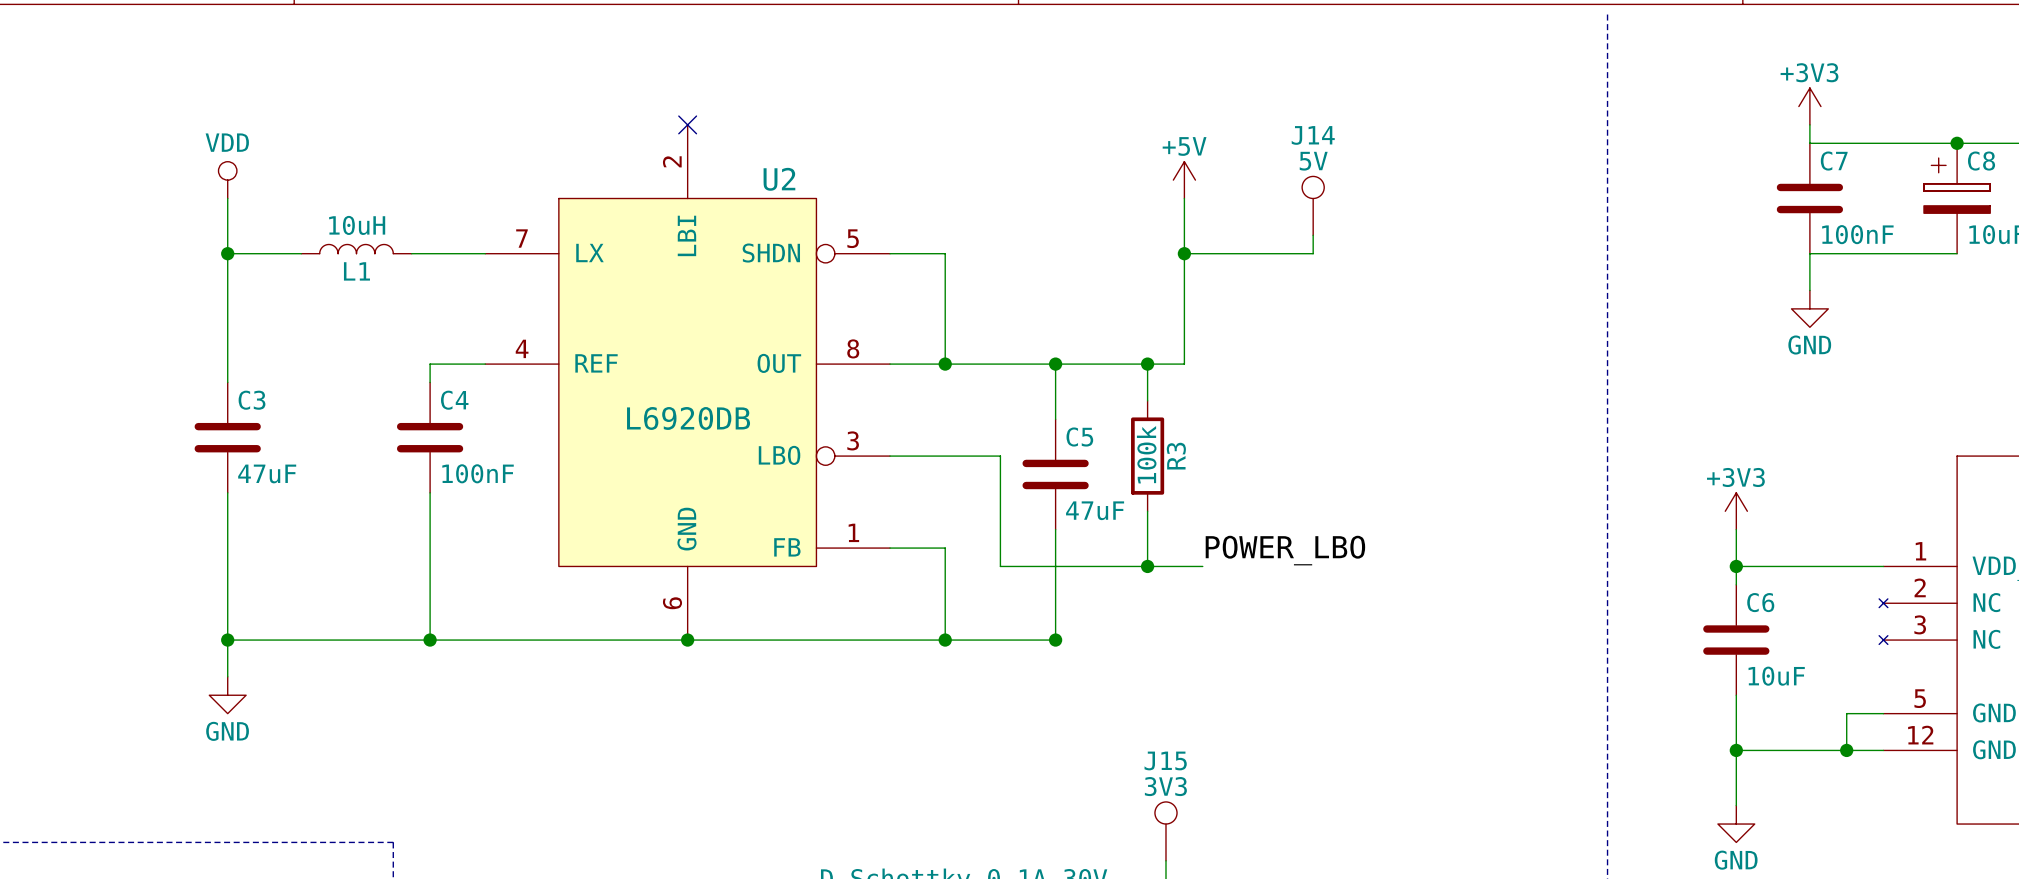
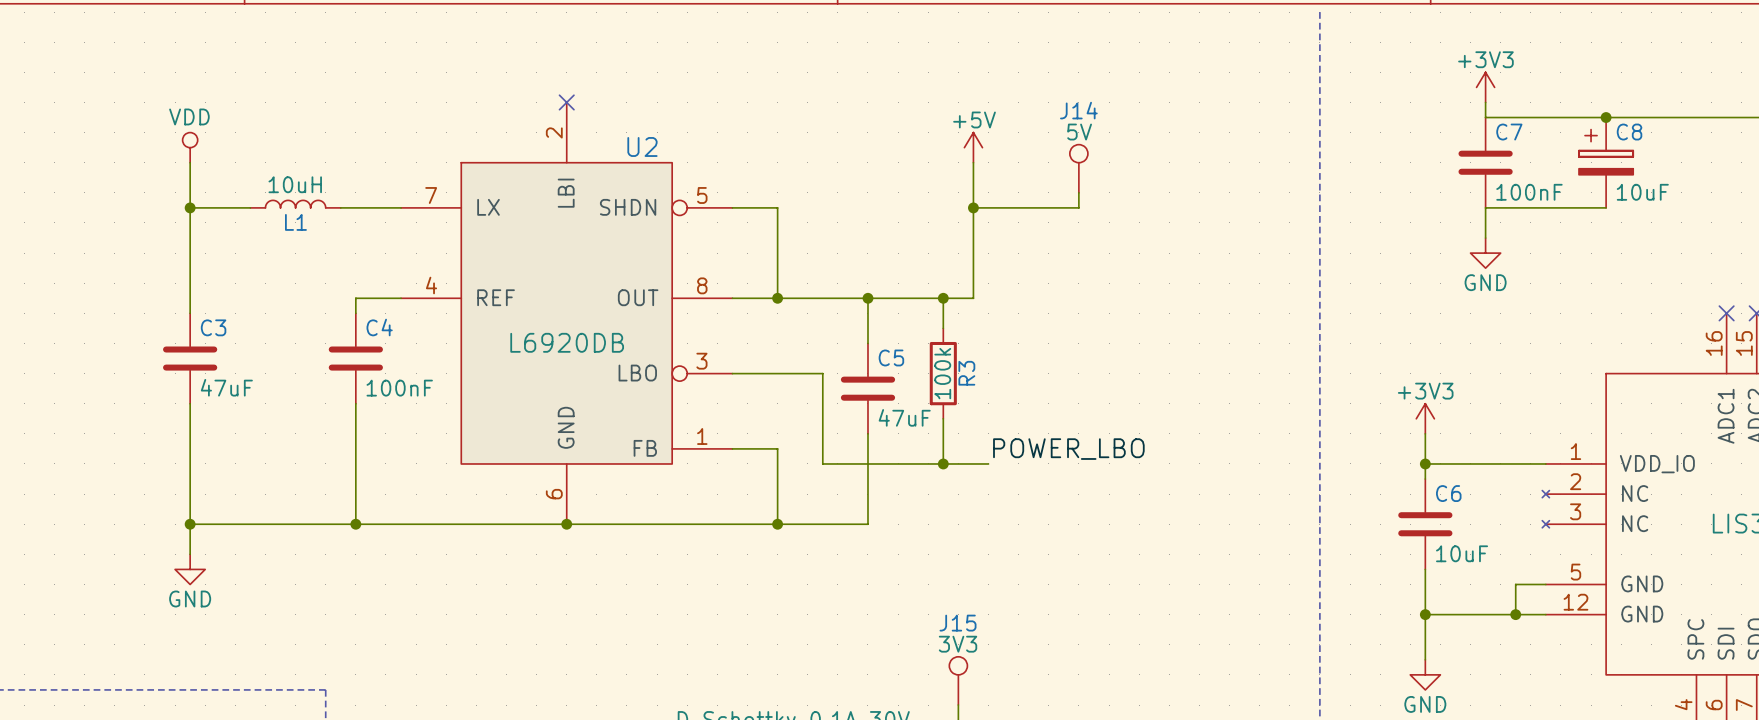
junction: (1055, 640) -> none

